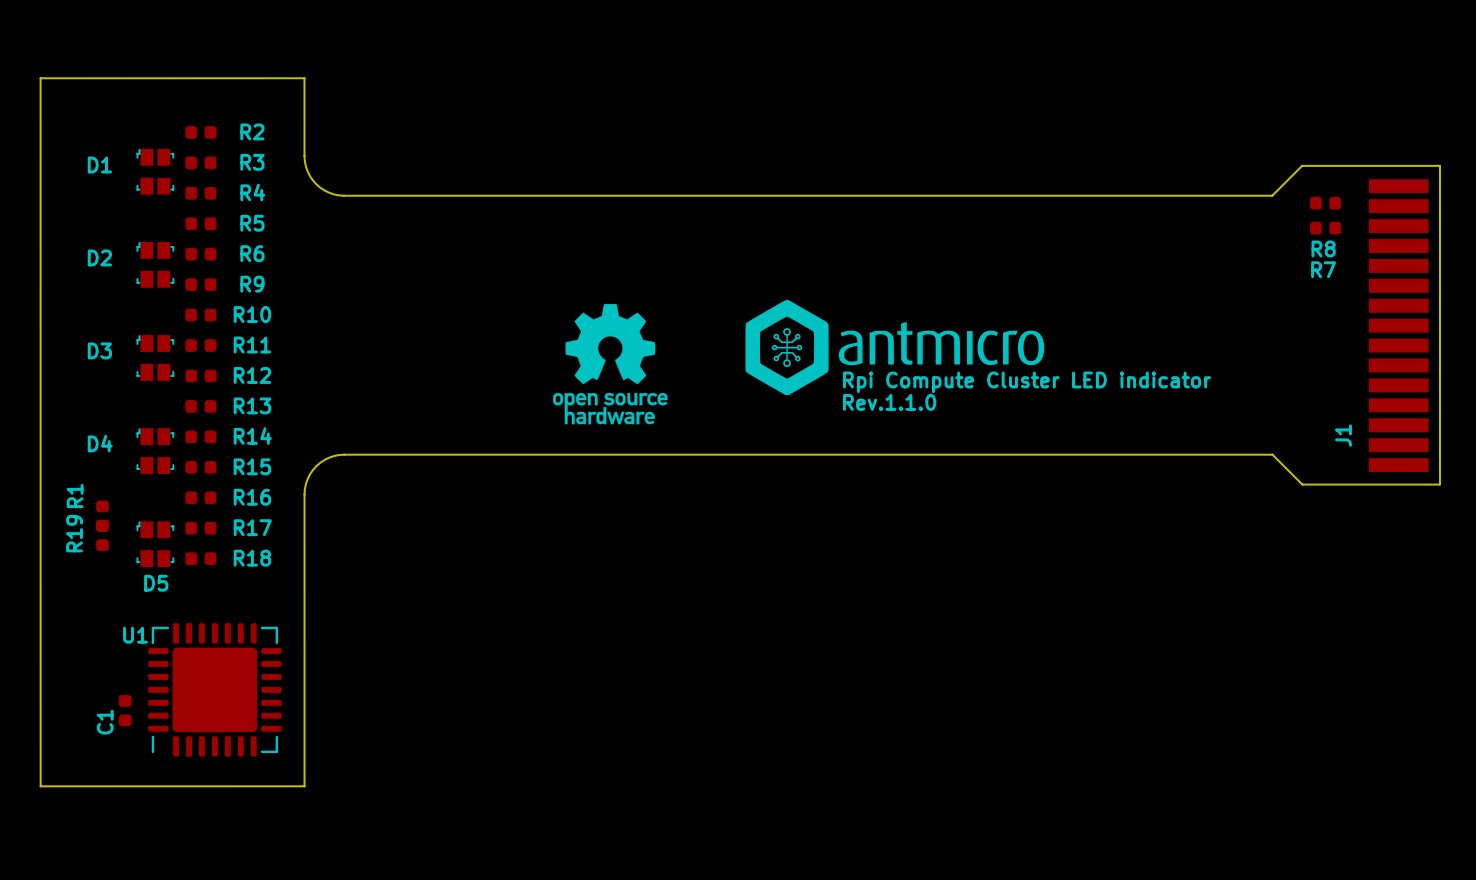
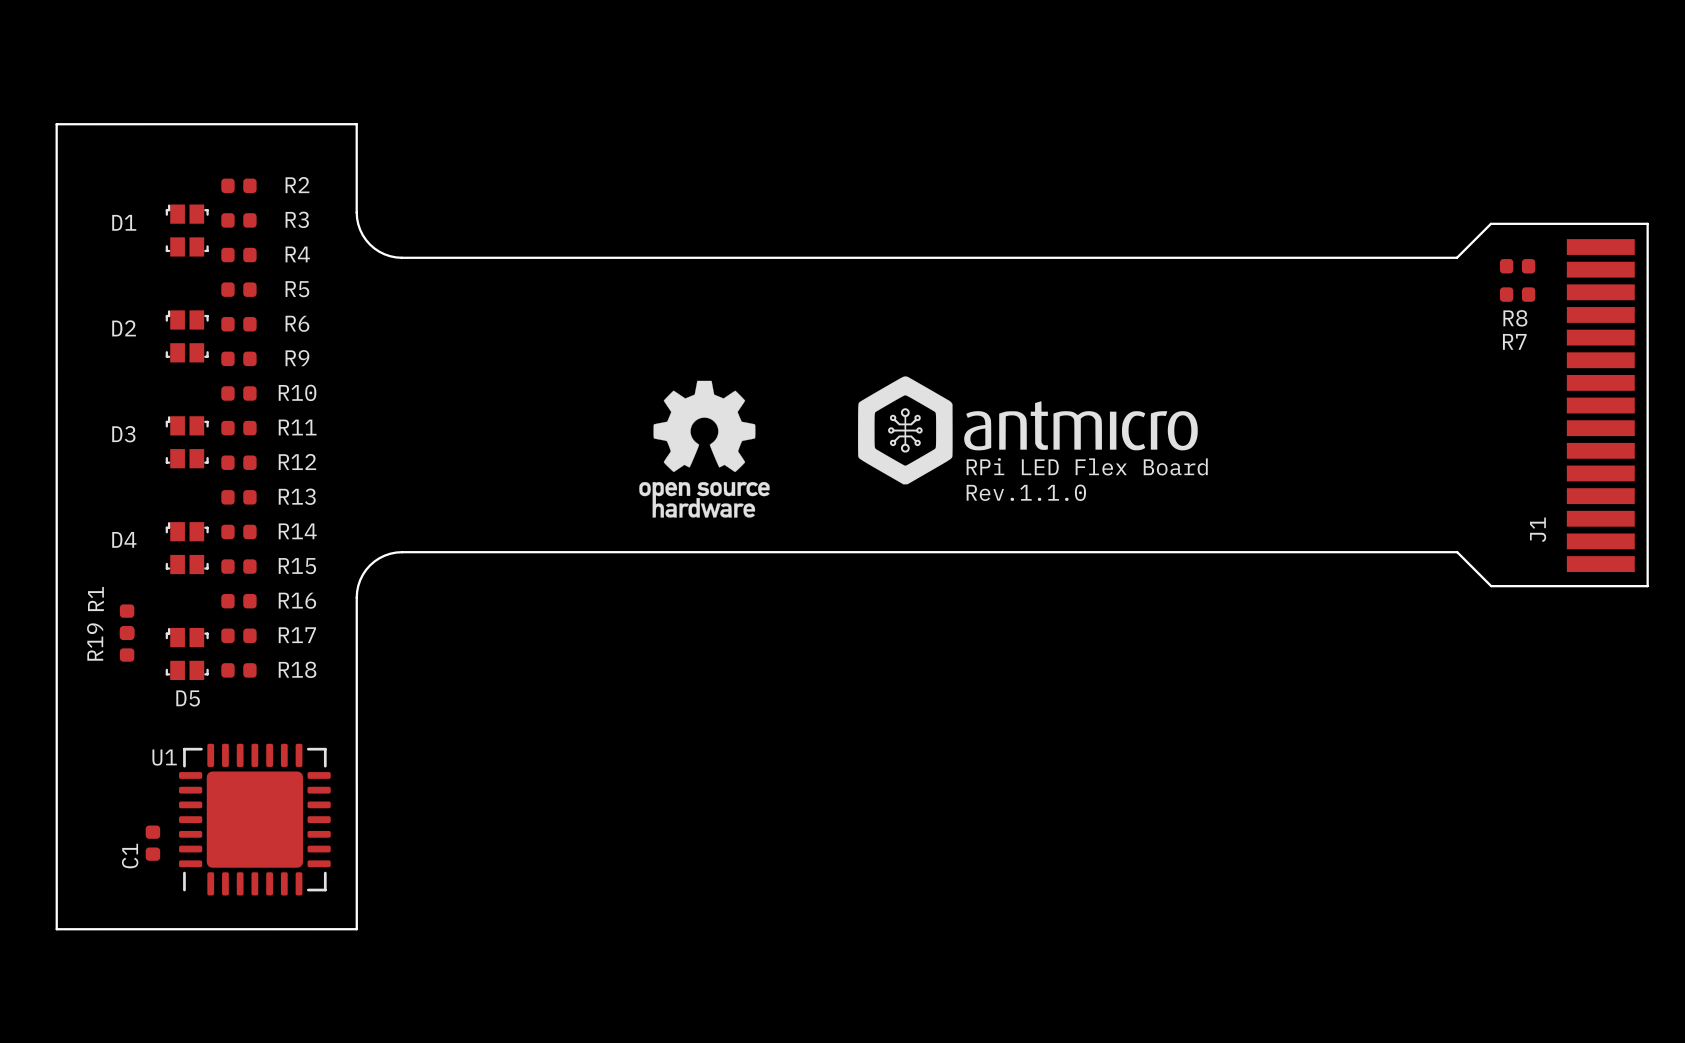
text: Rpi Compute Cluster LED indicator (1027, 382) -> RPi LED Flex Board (1087, 466)

